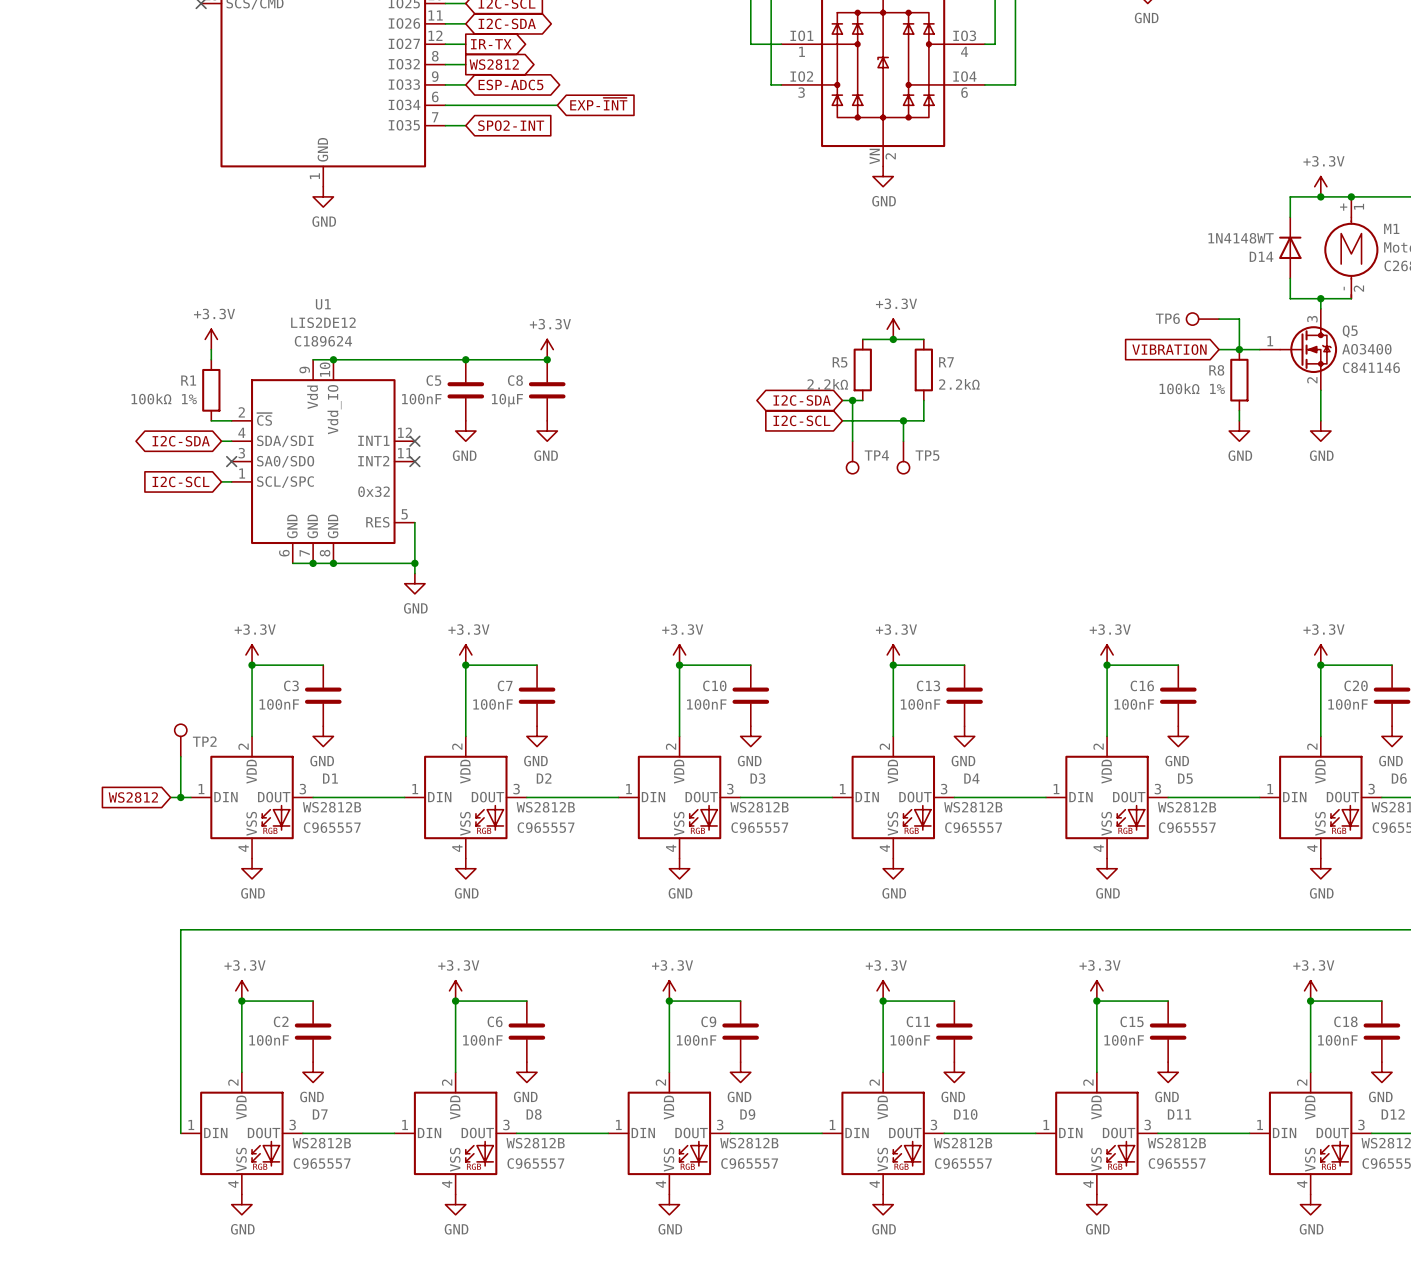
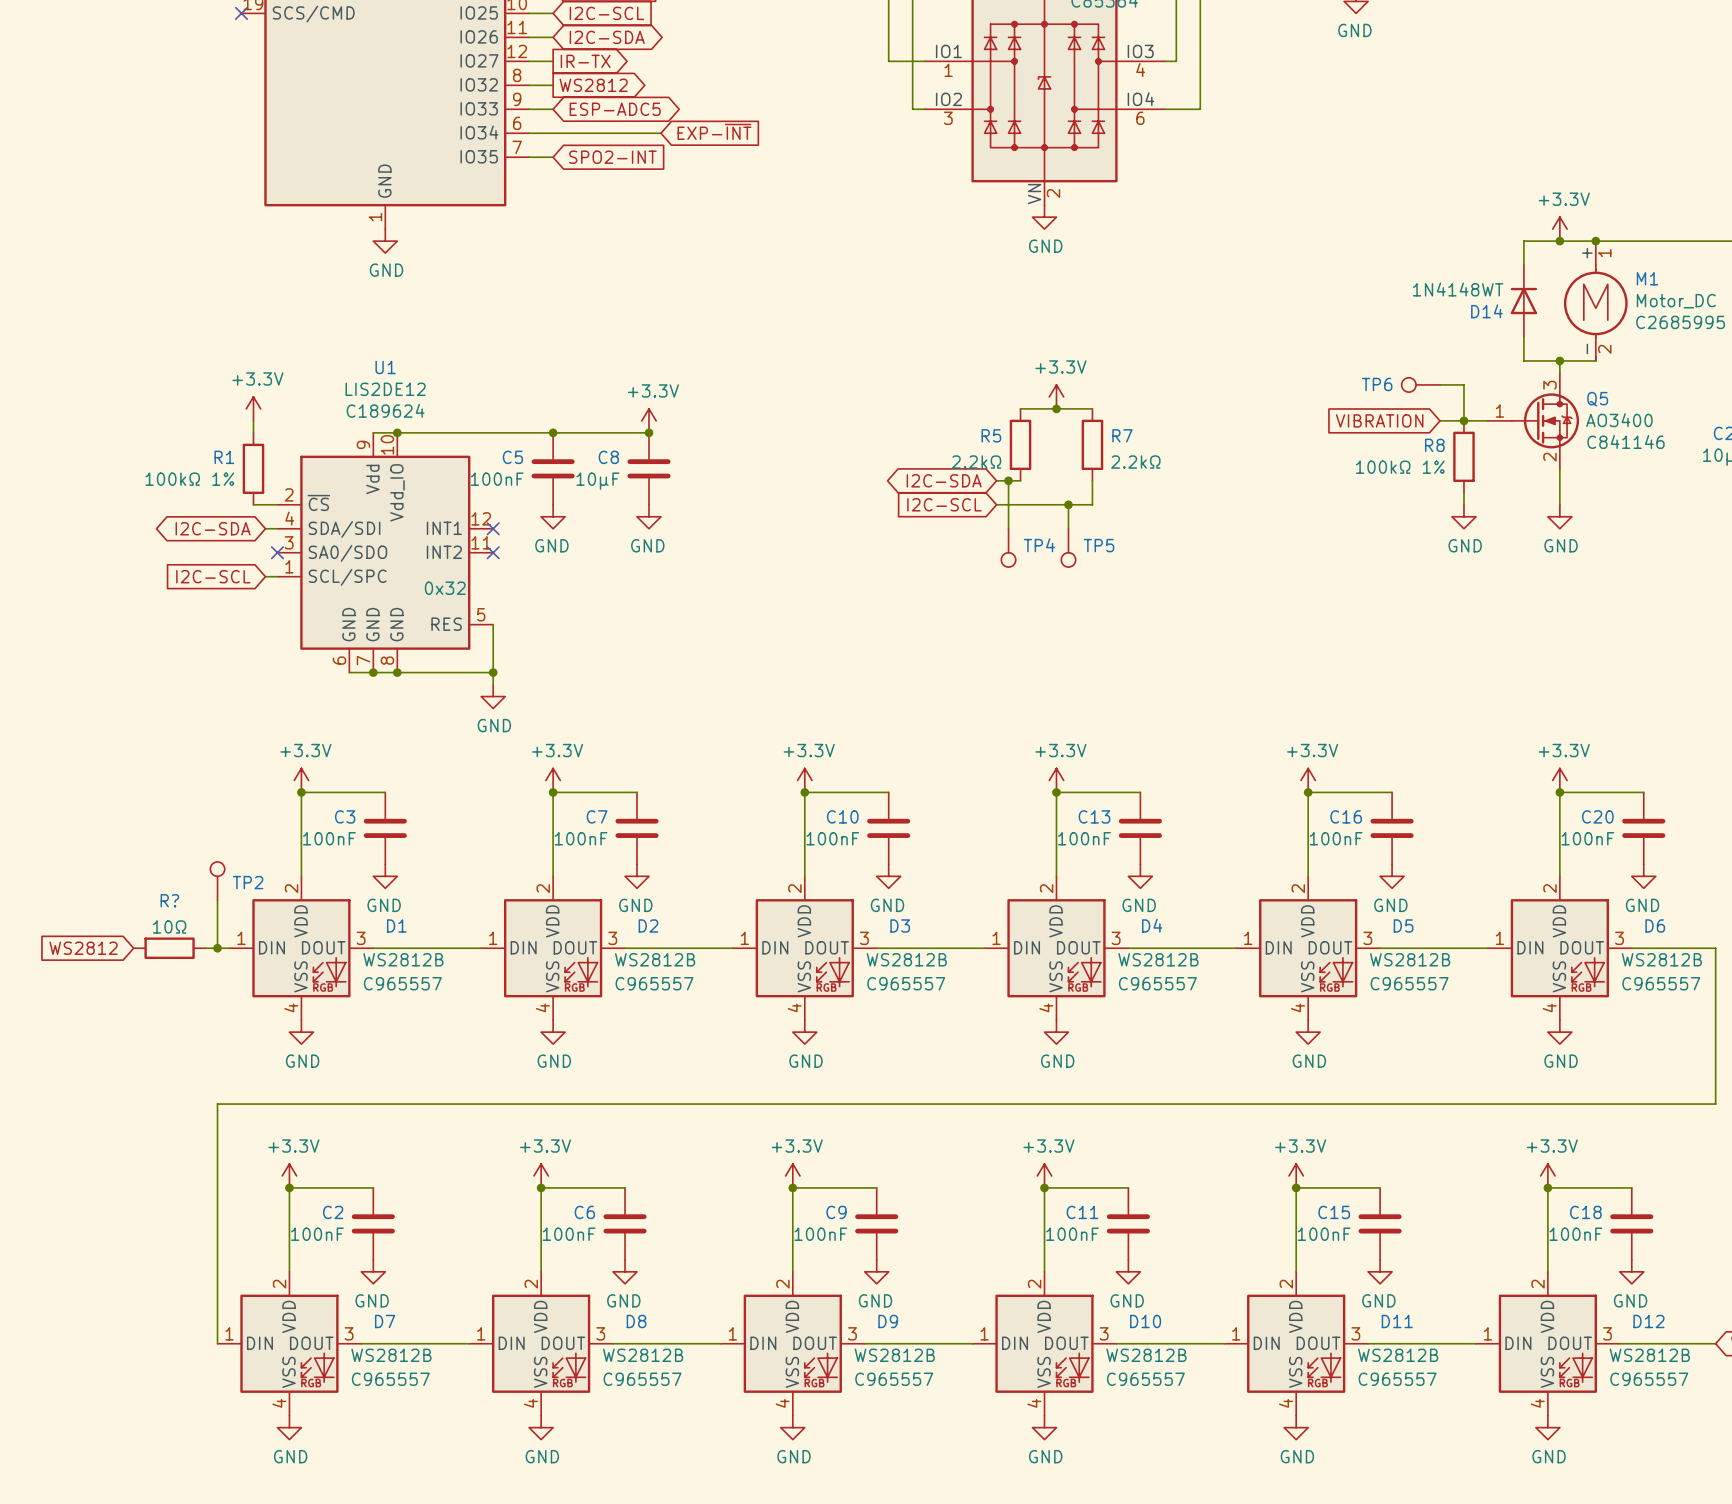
global label position: WS2812 (133, 797) -> WS2812 (83, 948)
R?: none -> 10Ω (169, 948)

